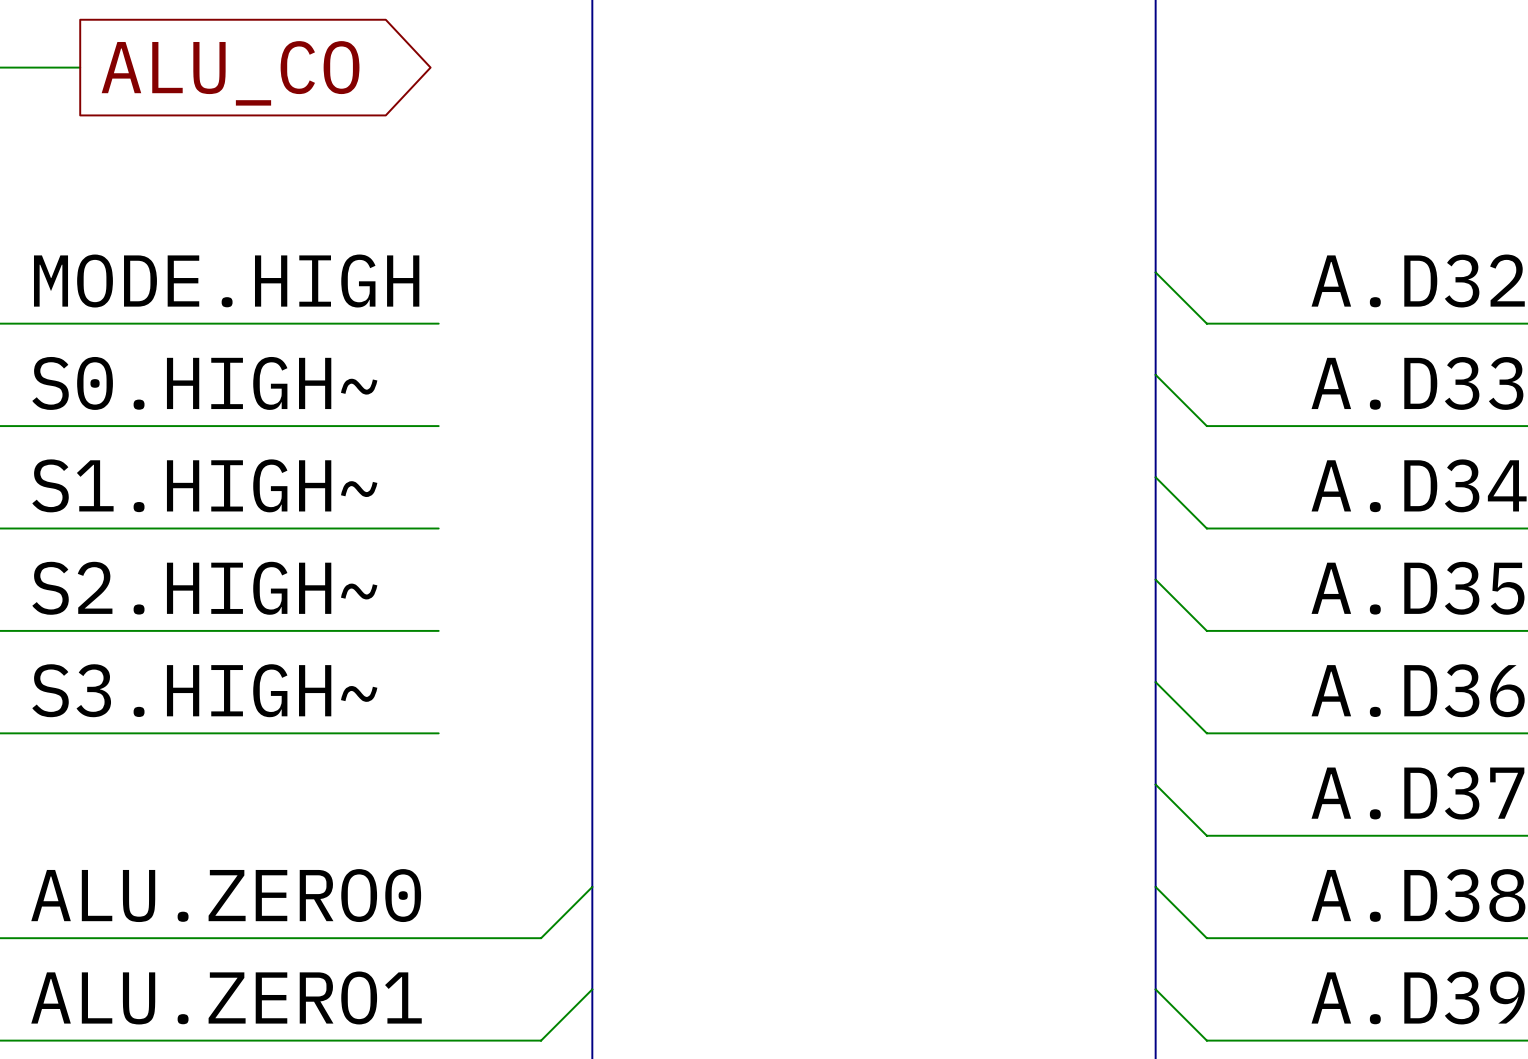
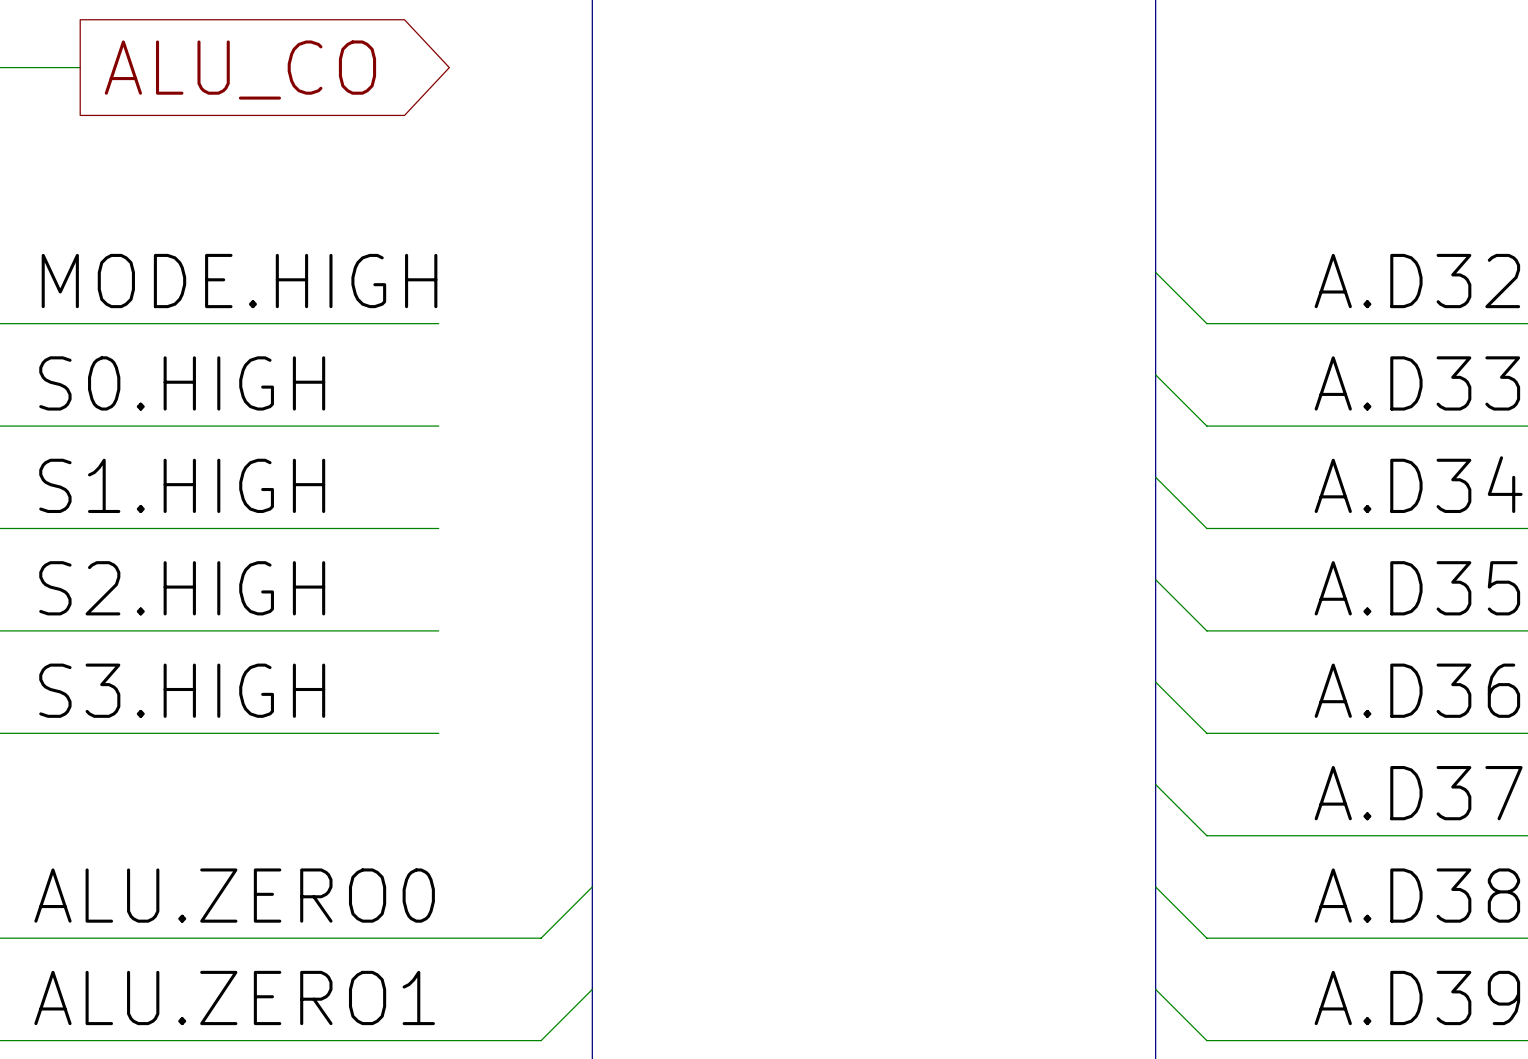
label: S0.HIGH~ (204, 383) -> S0.HIGH (182, 383)
label: S1.HIGH~ (204, 485) -> S1.HIGH (182, 485)
label: S2.HIGH~ (204, 588) -> S2.HIGH (182, 588)
label: S3.HIGH~ (204, 690) -> S3.HIGH (182, 690)

